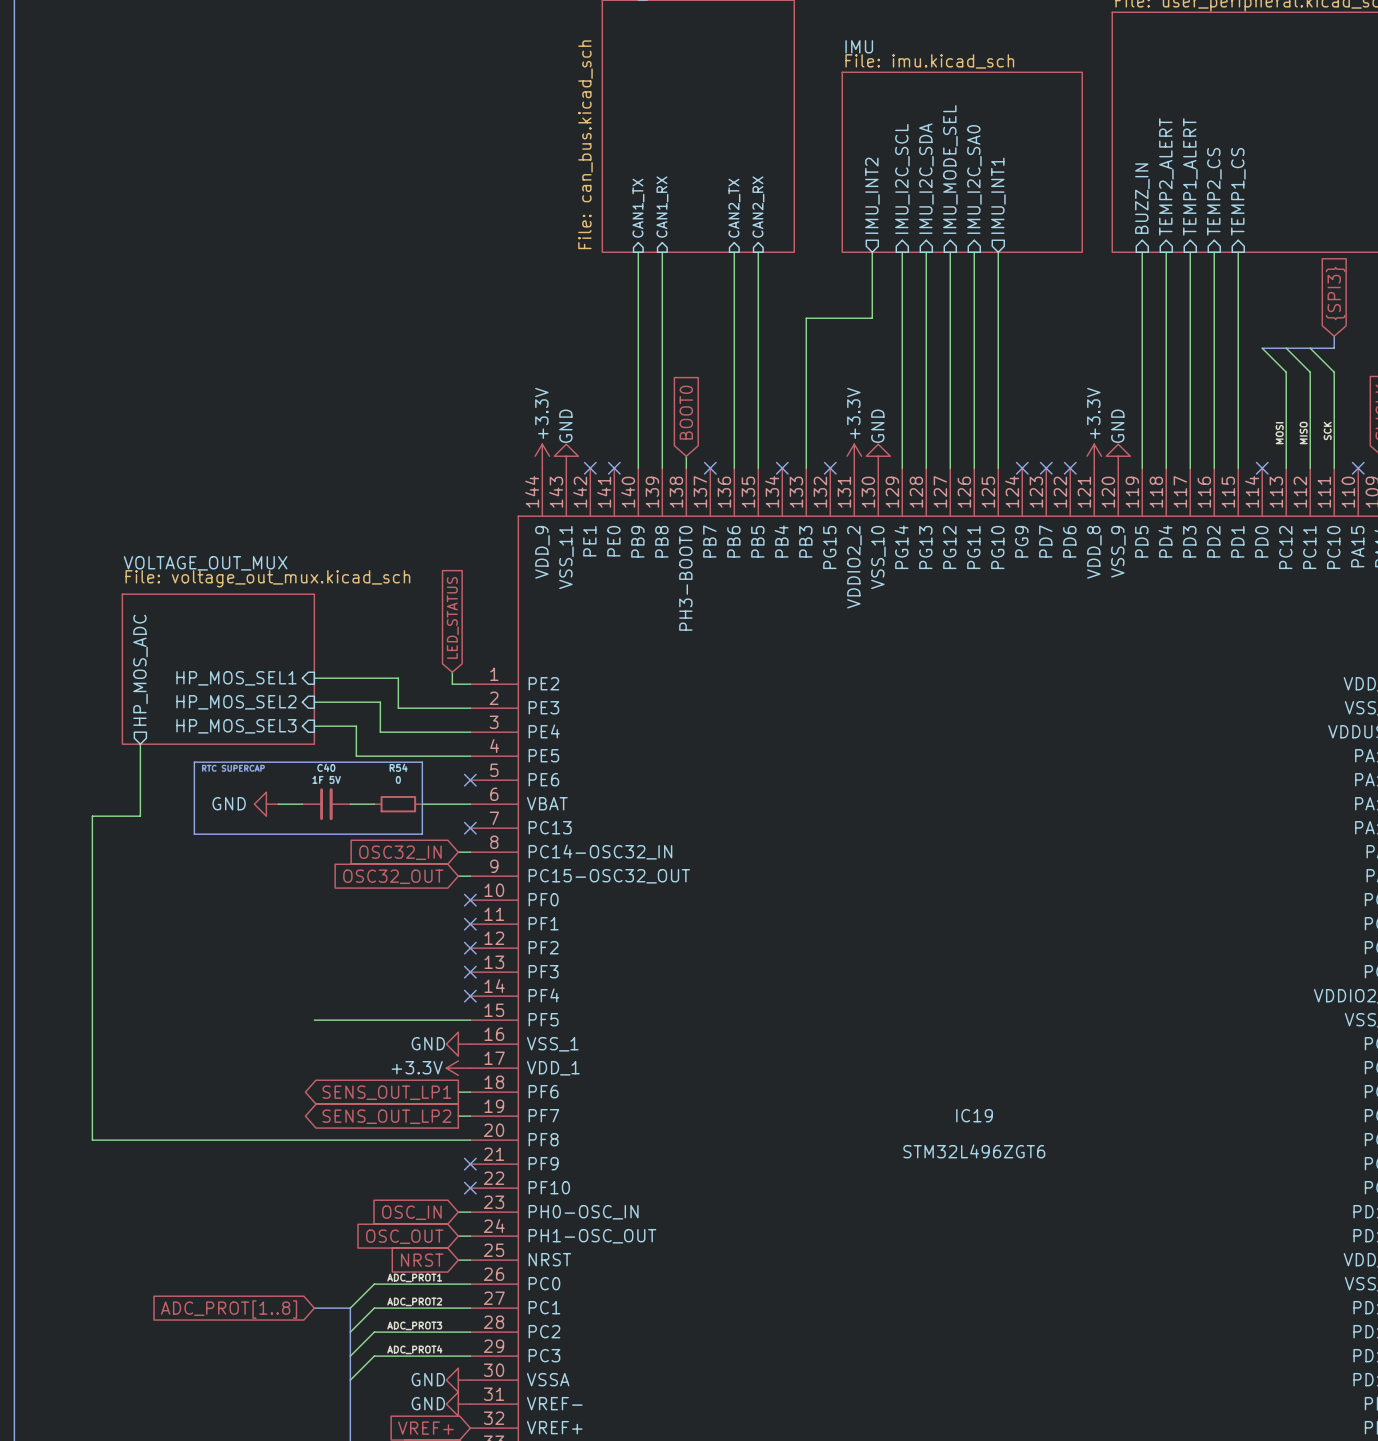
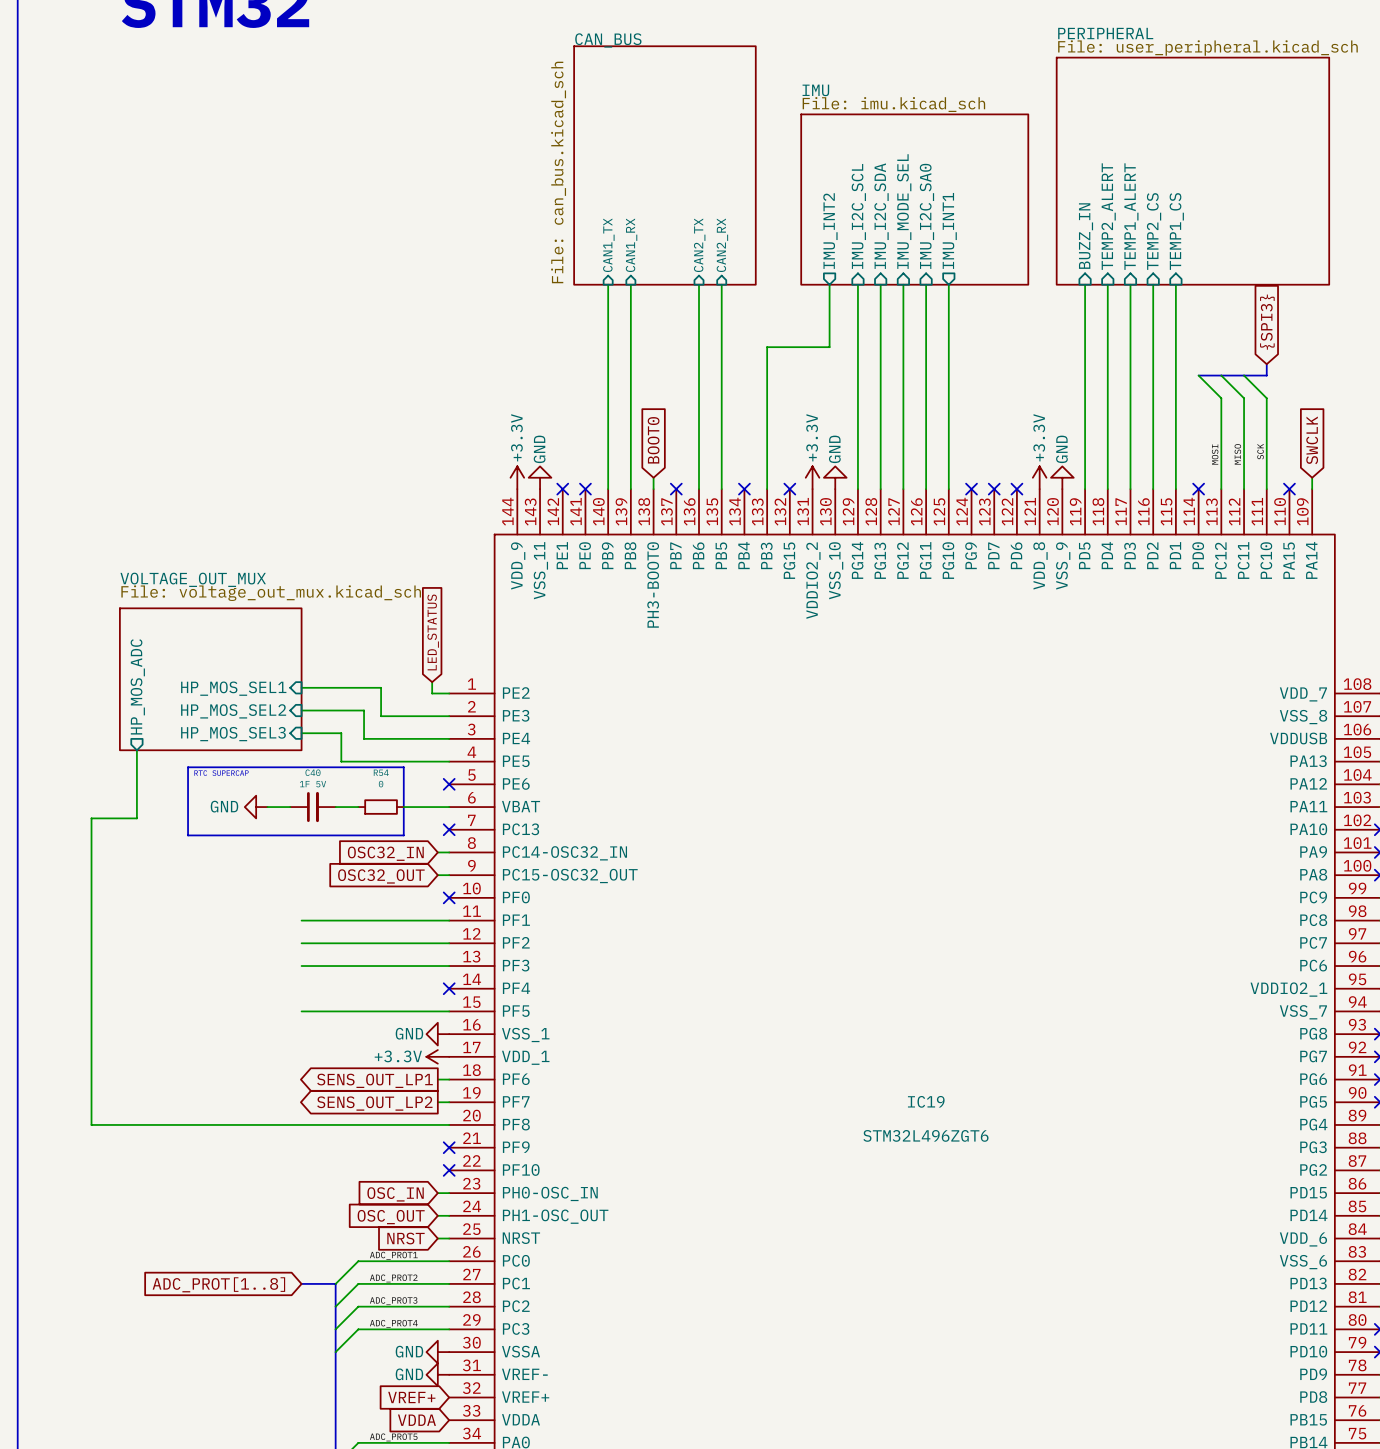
wire: none -> (301, 920) (449, 920)
no-connect mark: (470, 924) -> none
wire: none -> (301, 943) (449, 943)
no-connect mark: (470, 948) -> none
wire: none -> (301, 966) (449, 966)
no-connect mark: (470, 972) -> none

